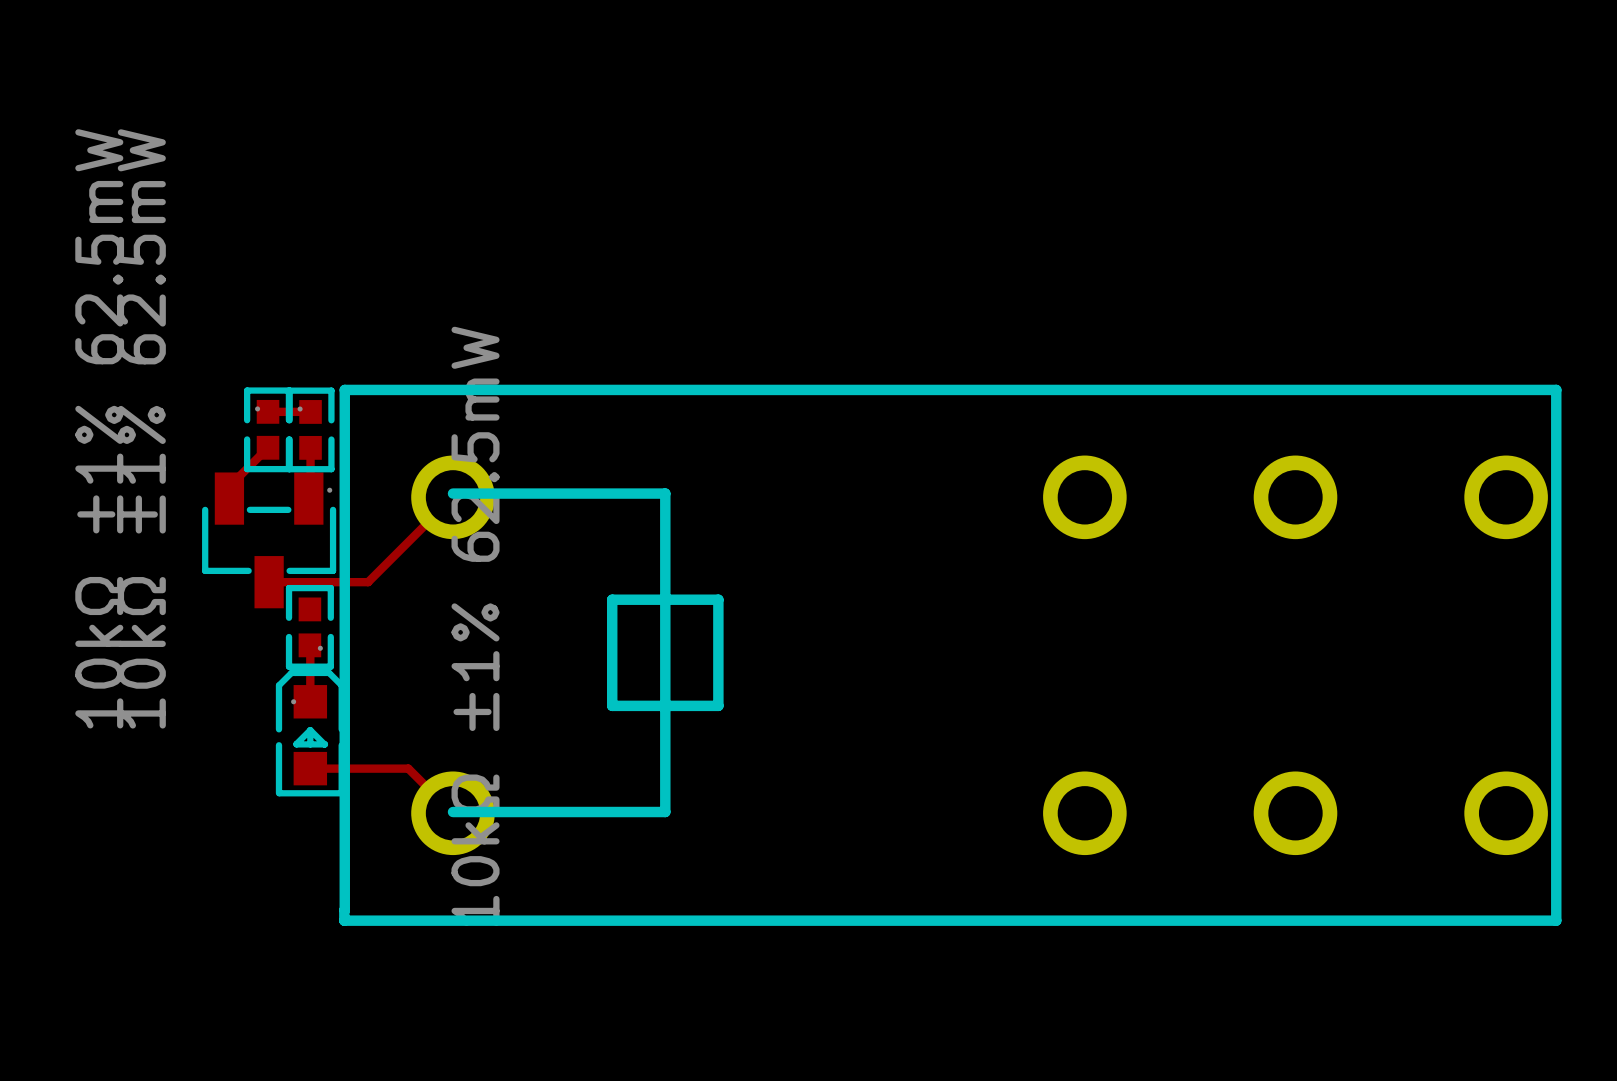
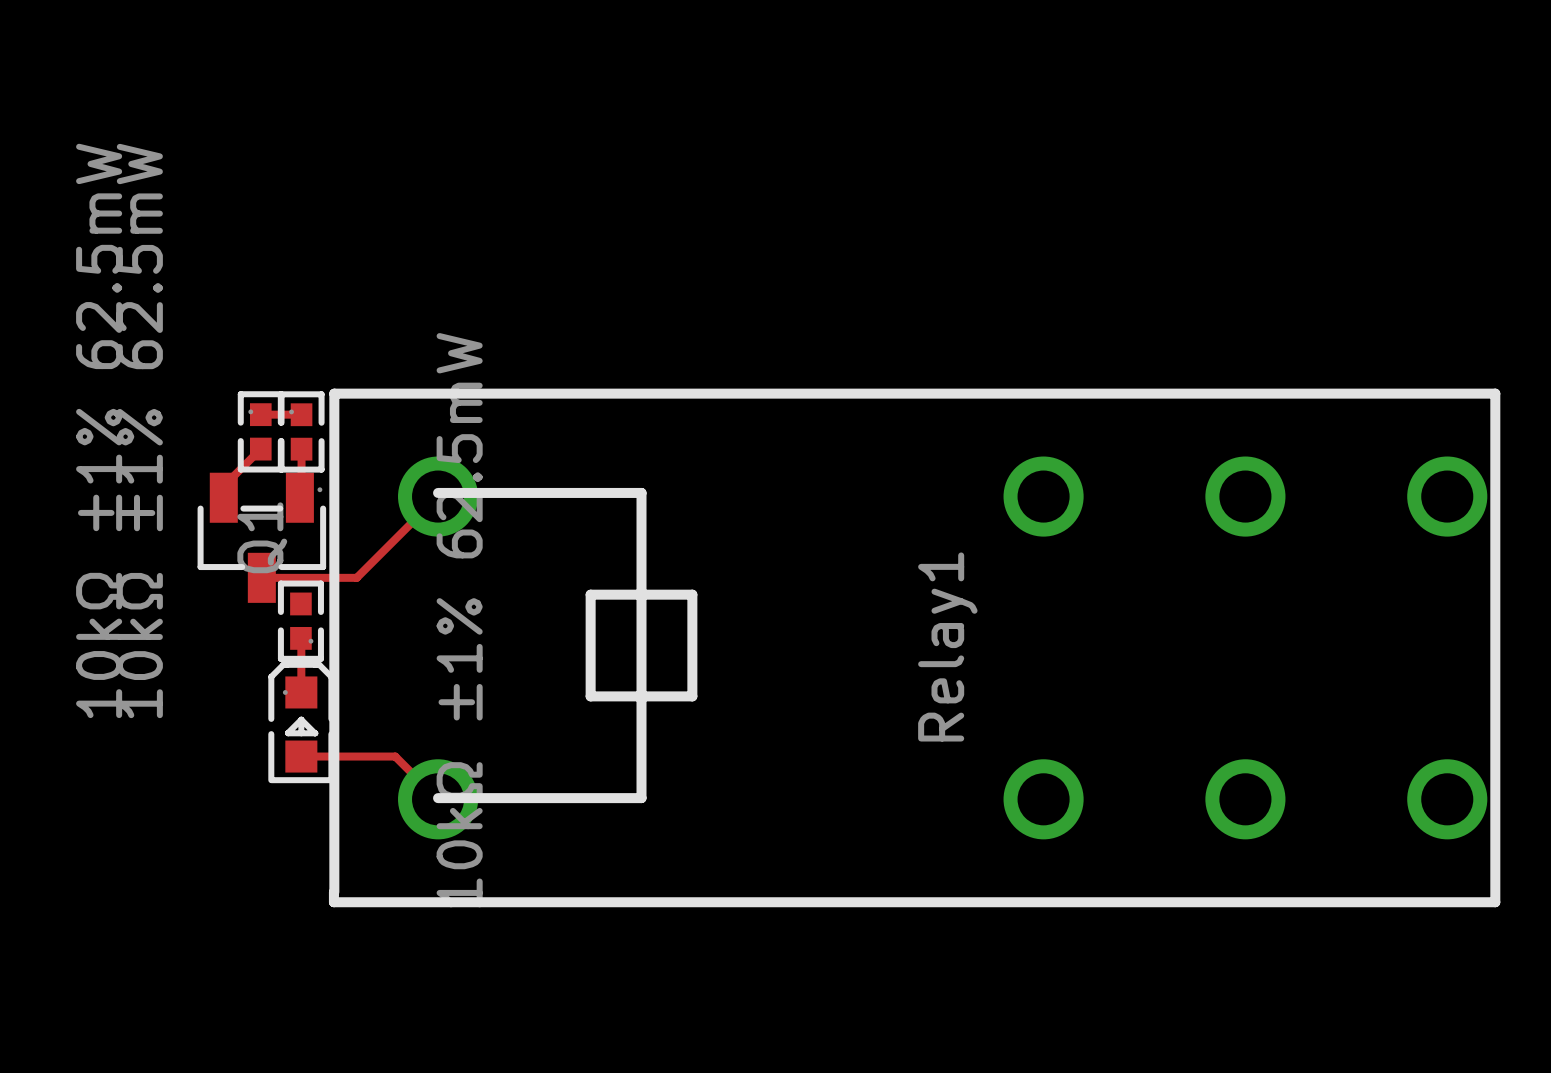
Q1 name: none -> Q1 (262, 537)
Relay1 name: none -> Relay1 (947, 646)

